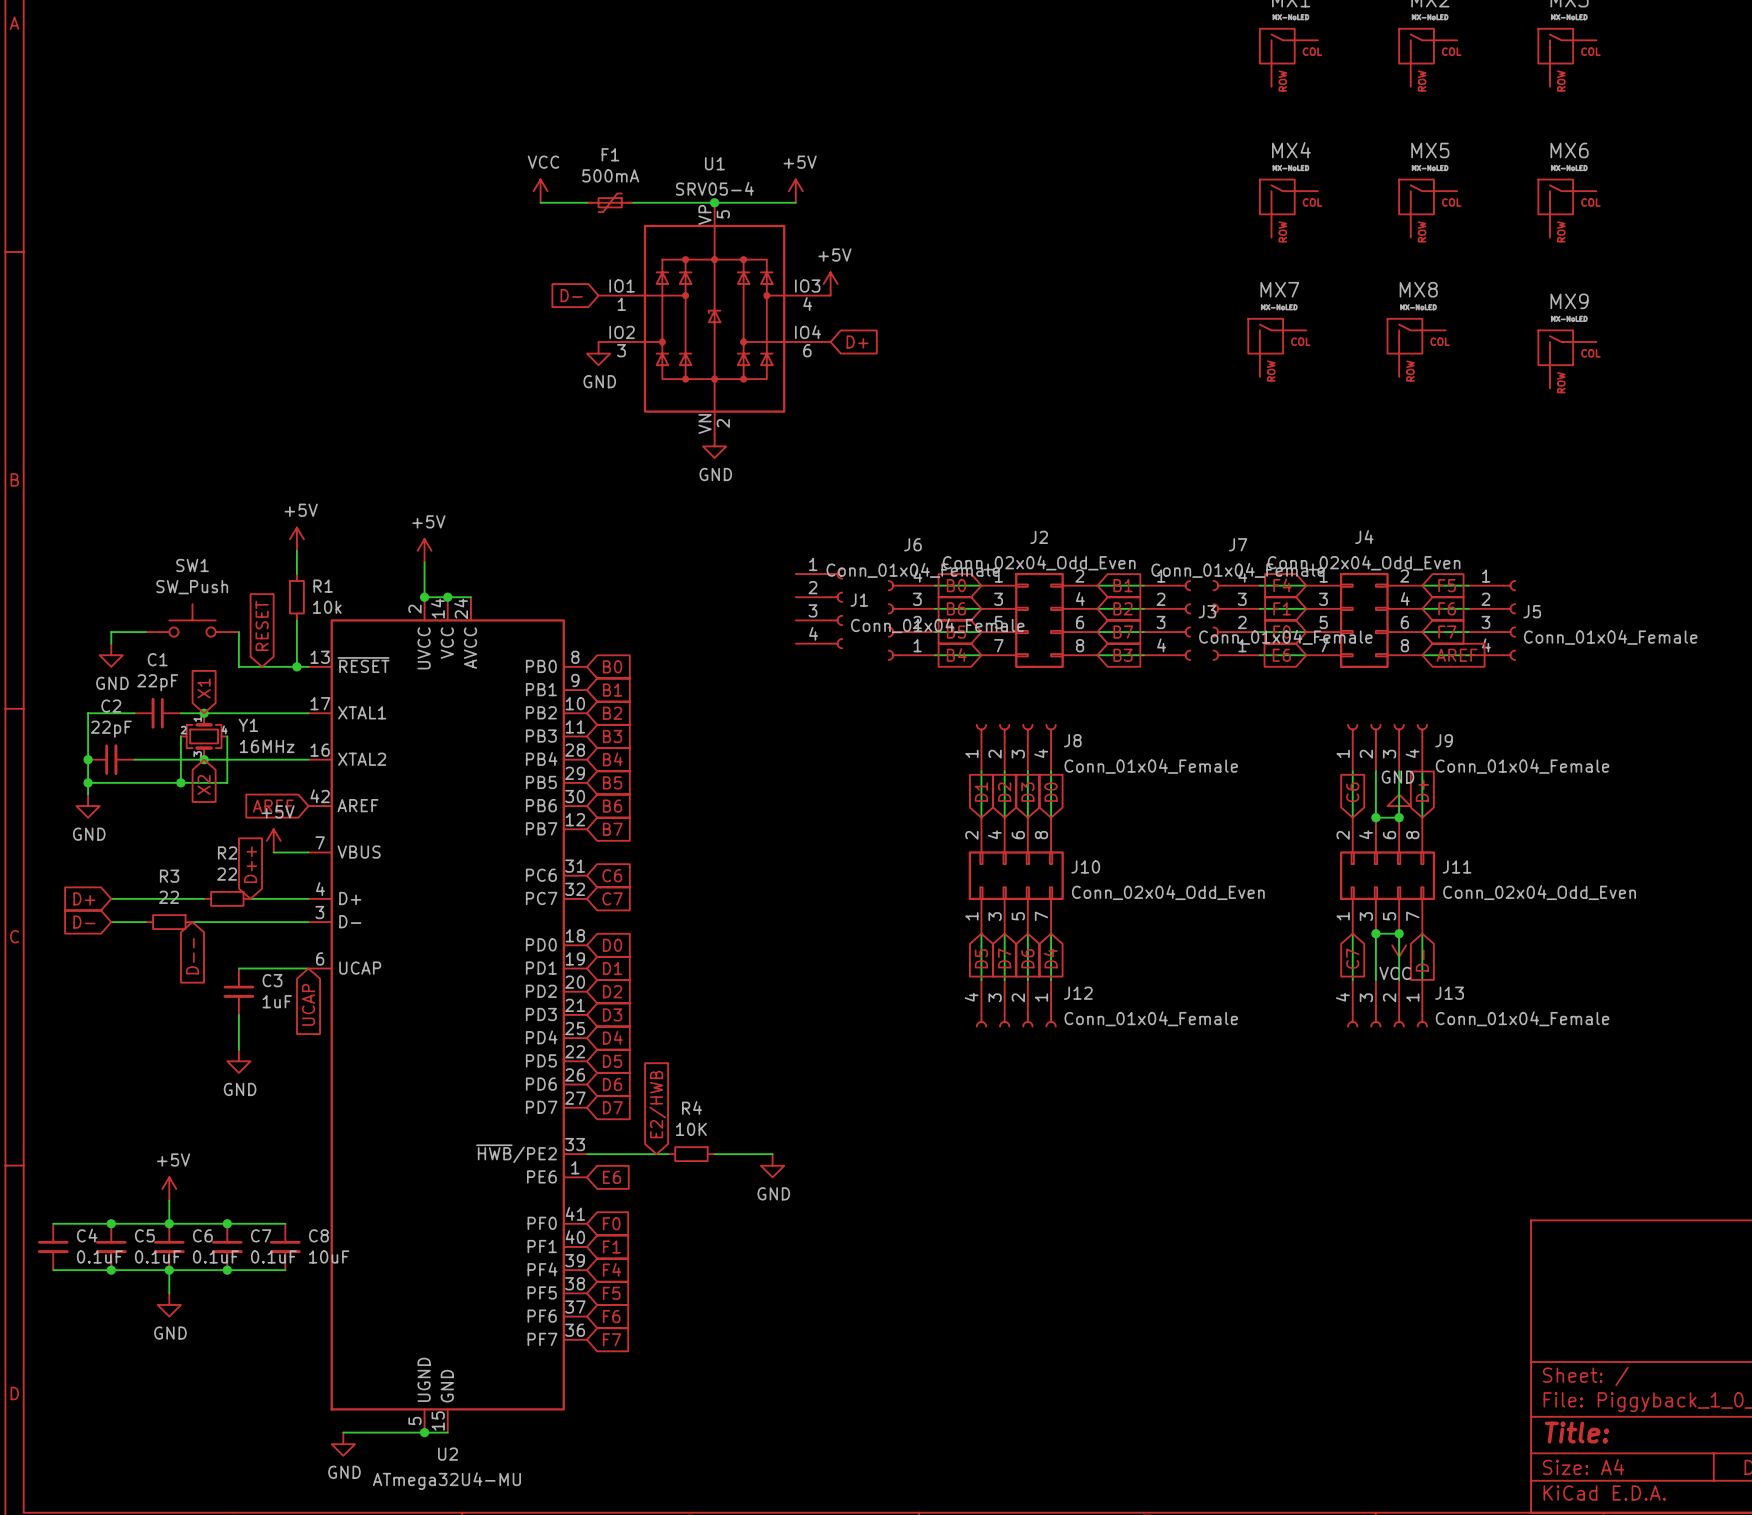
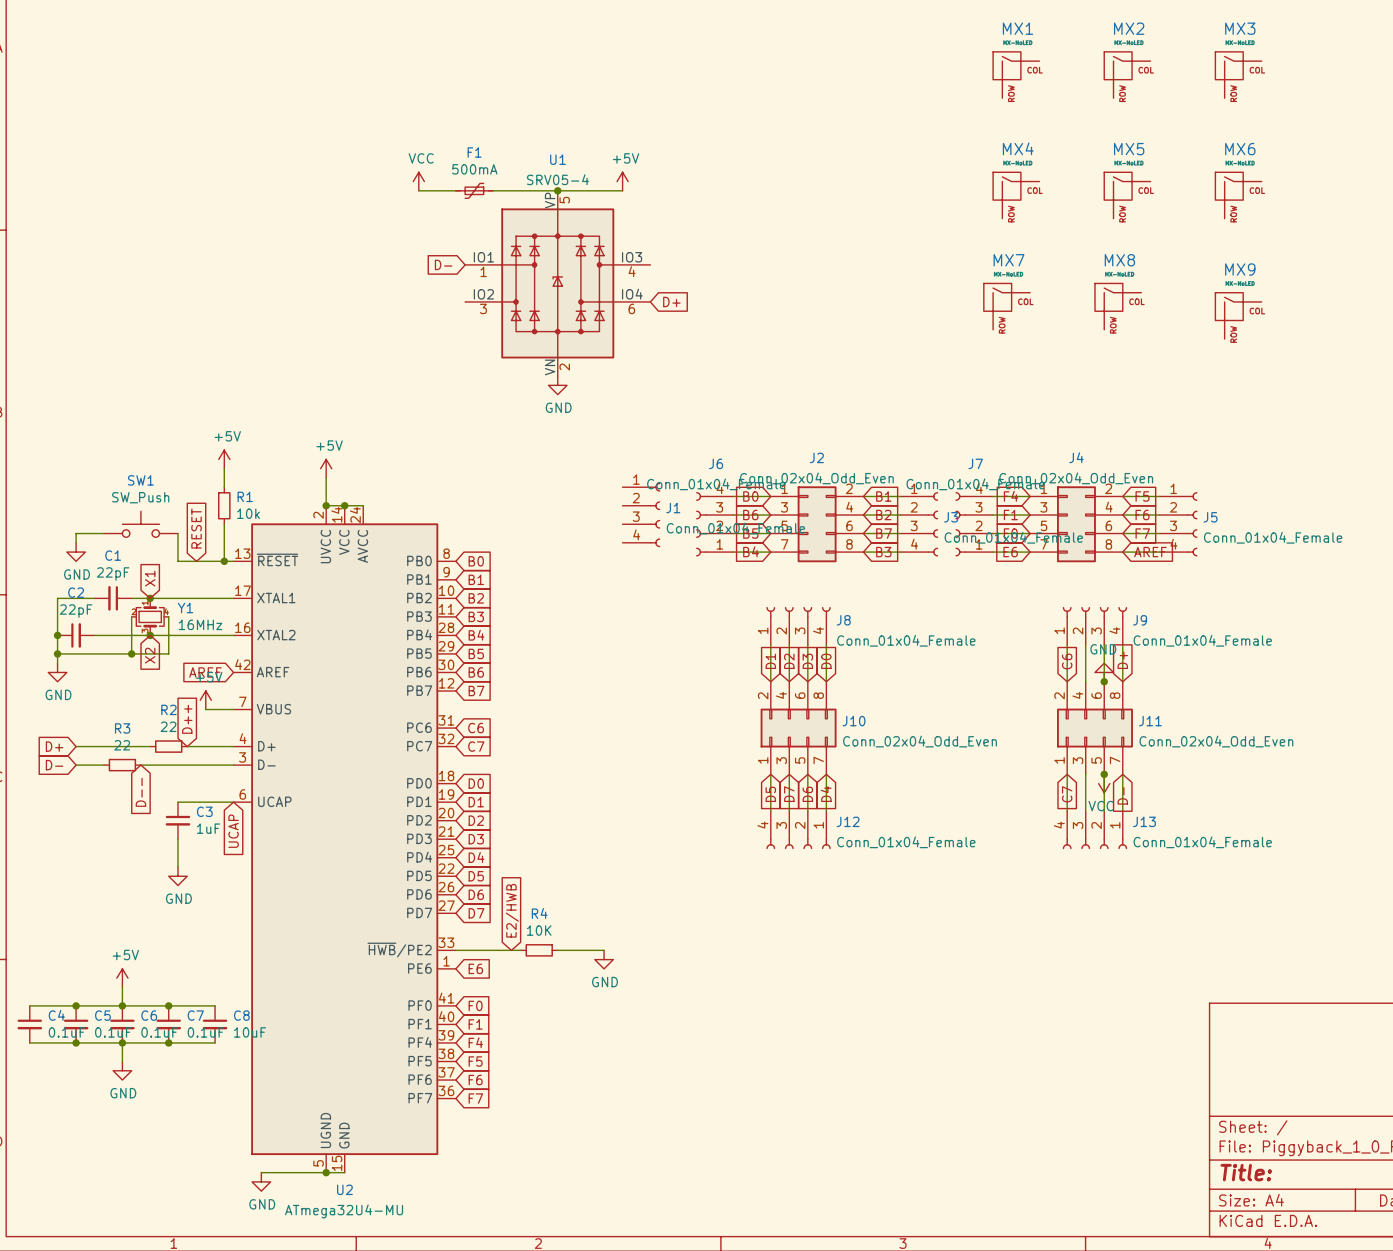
power symbol: +5V (830, 283) -> none
power symbol: GND (598, 353) -> none
wire: (1375, 817) (1399, 817) -> none
junction: (1375, 817) -> none
wire: (1375, 933) (1399, 933) -> none
junction: (1375, 933) -> none

